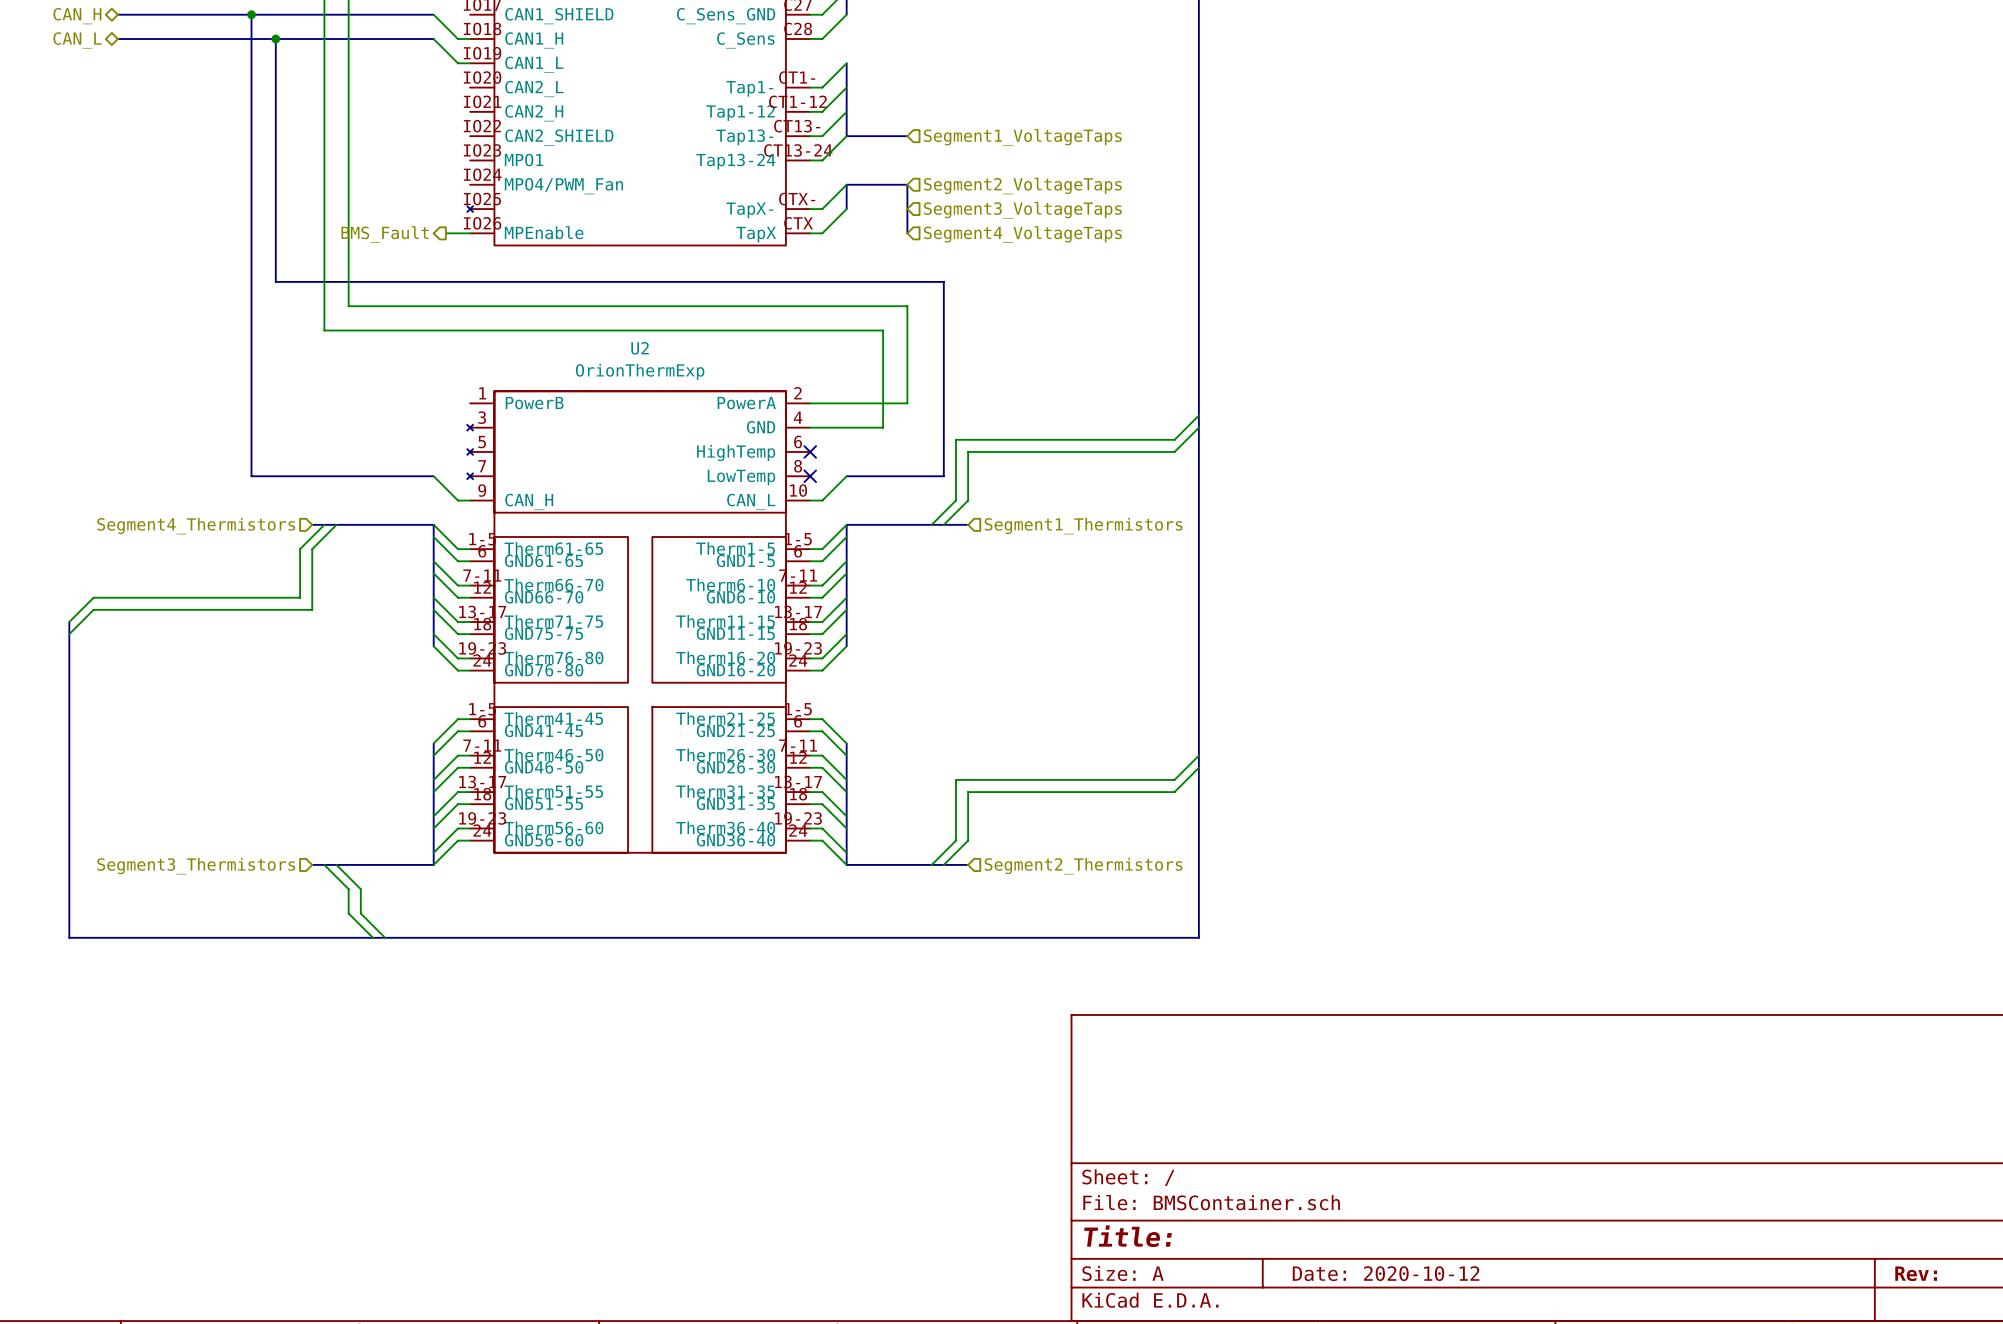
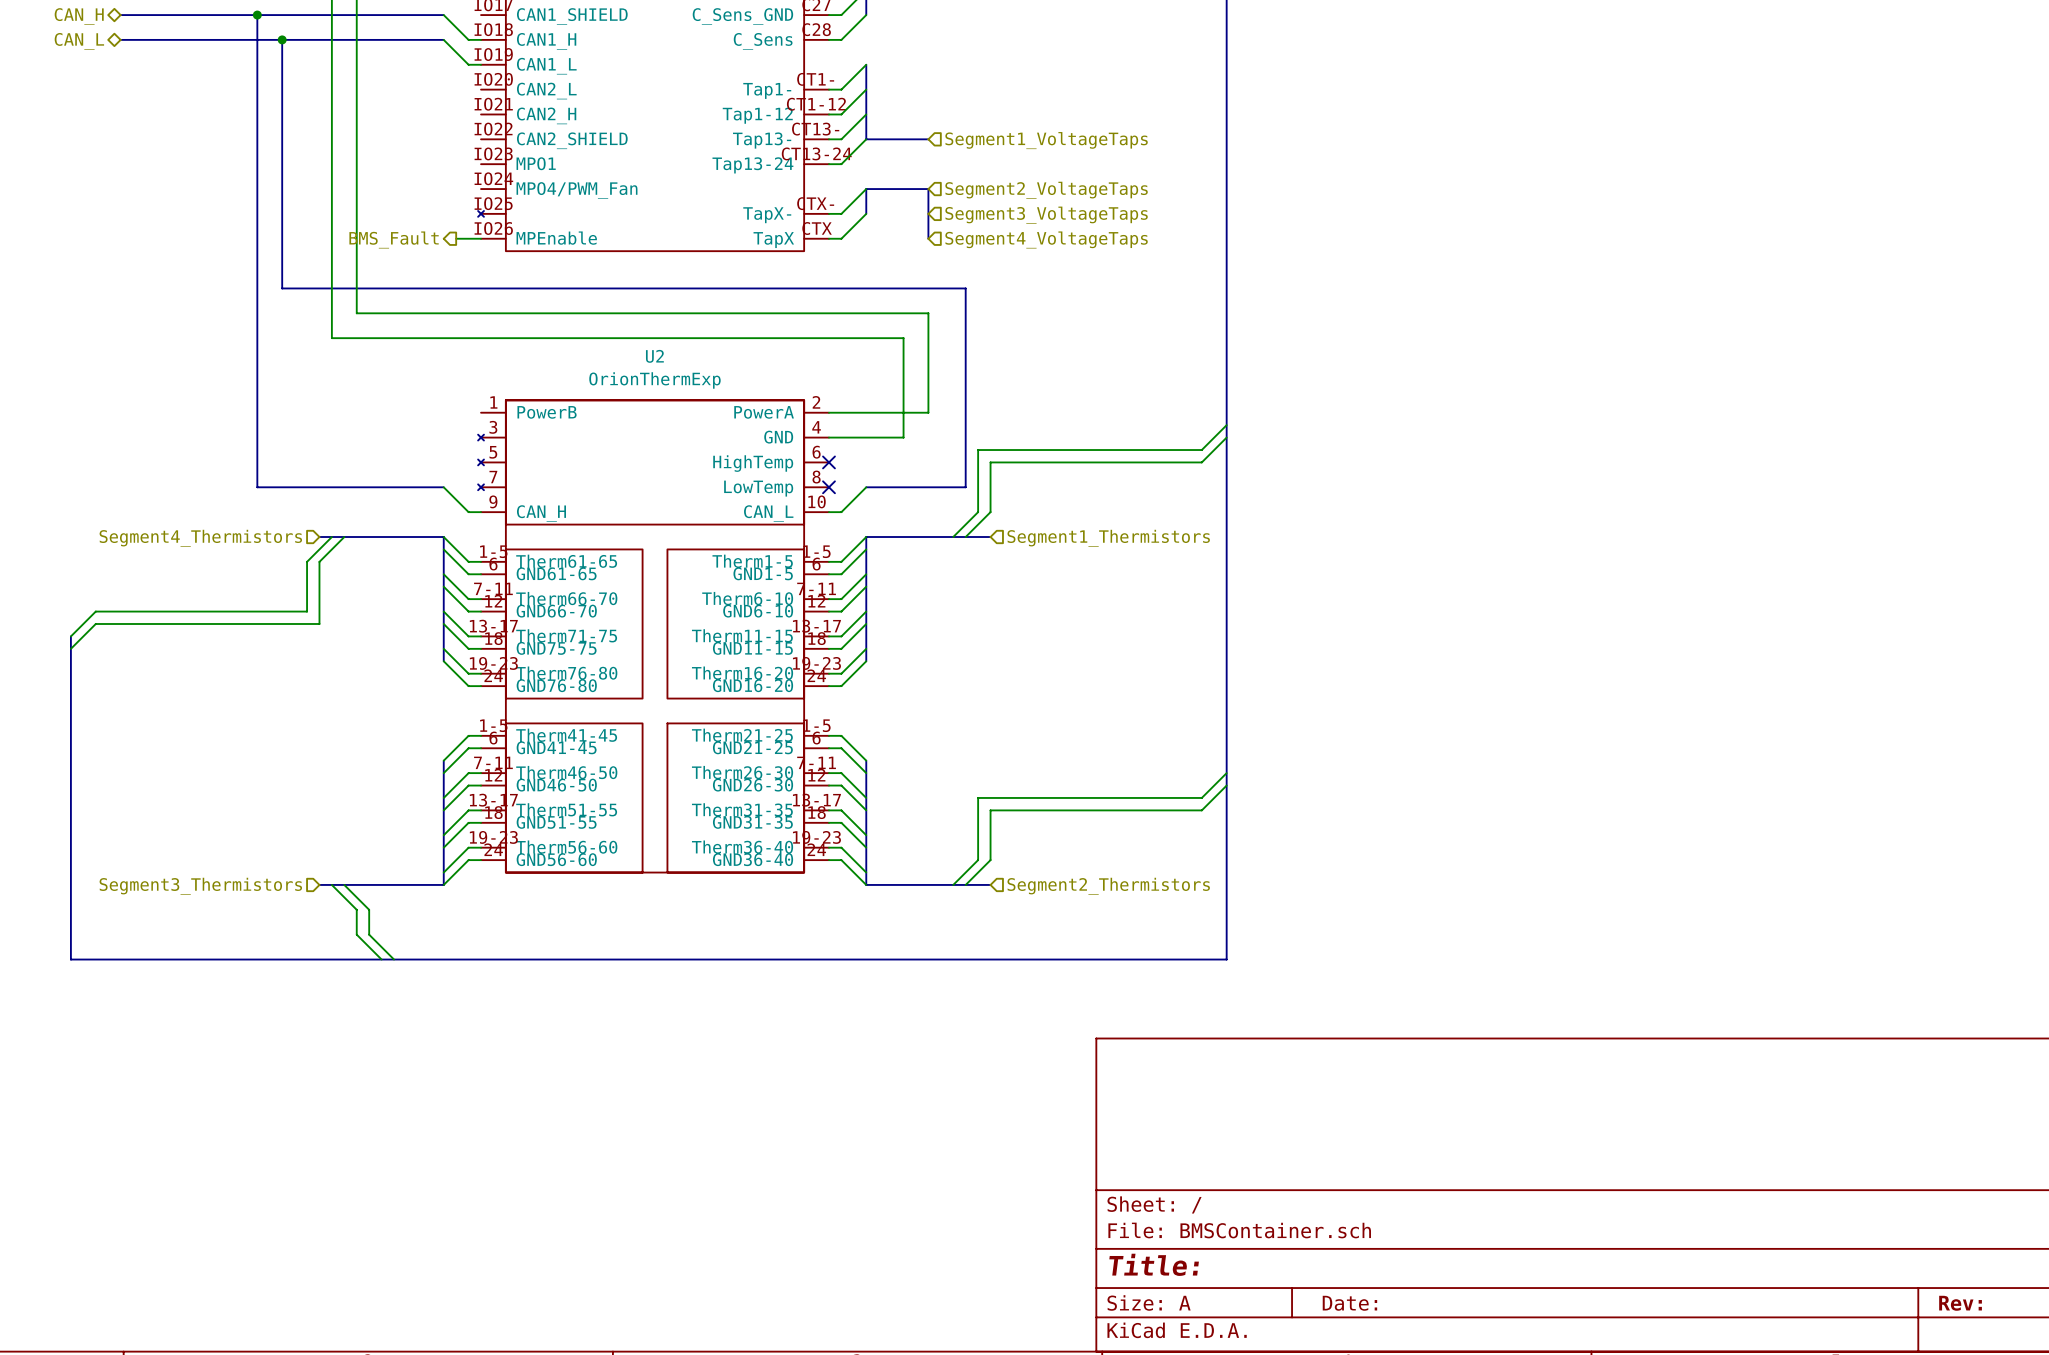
title block: Date: 2020-10-12 (1386, 1273) -> Date: (1349, 1303)

